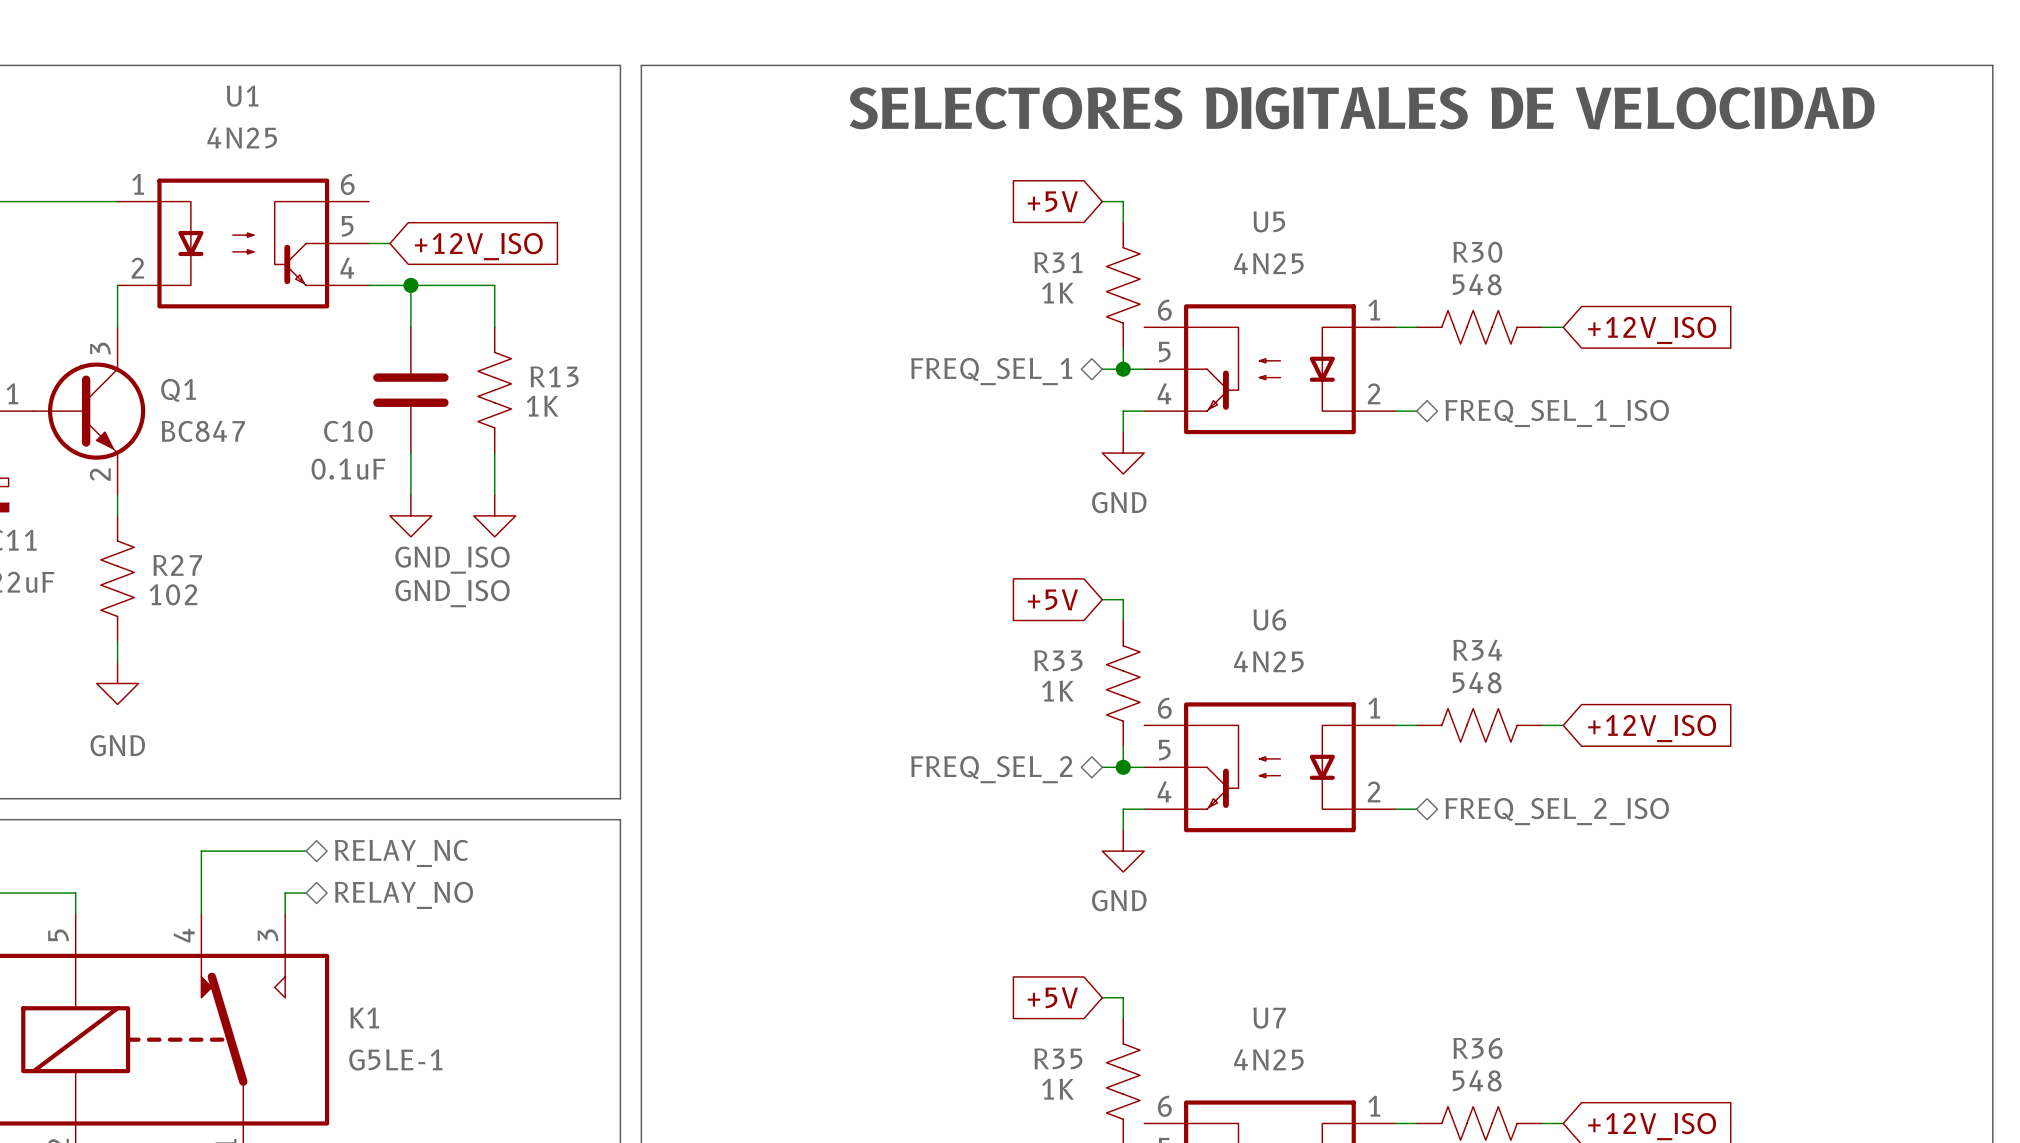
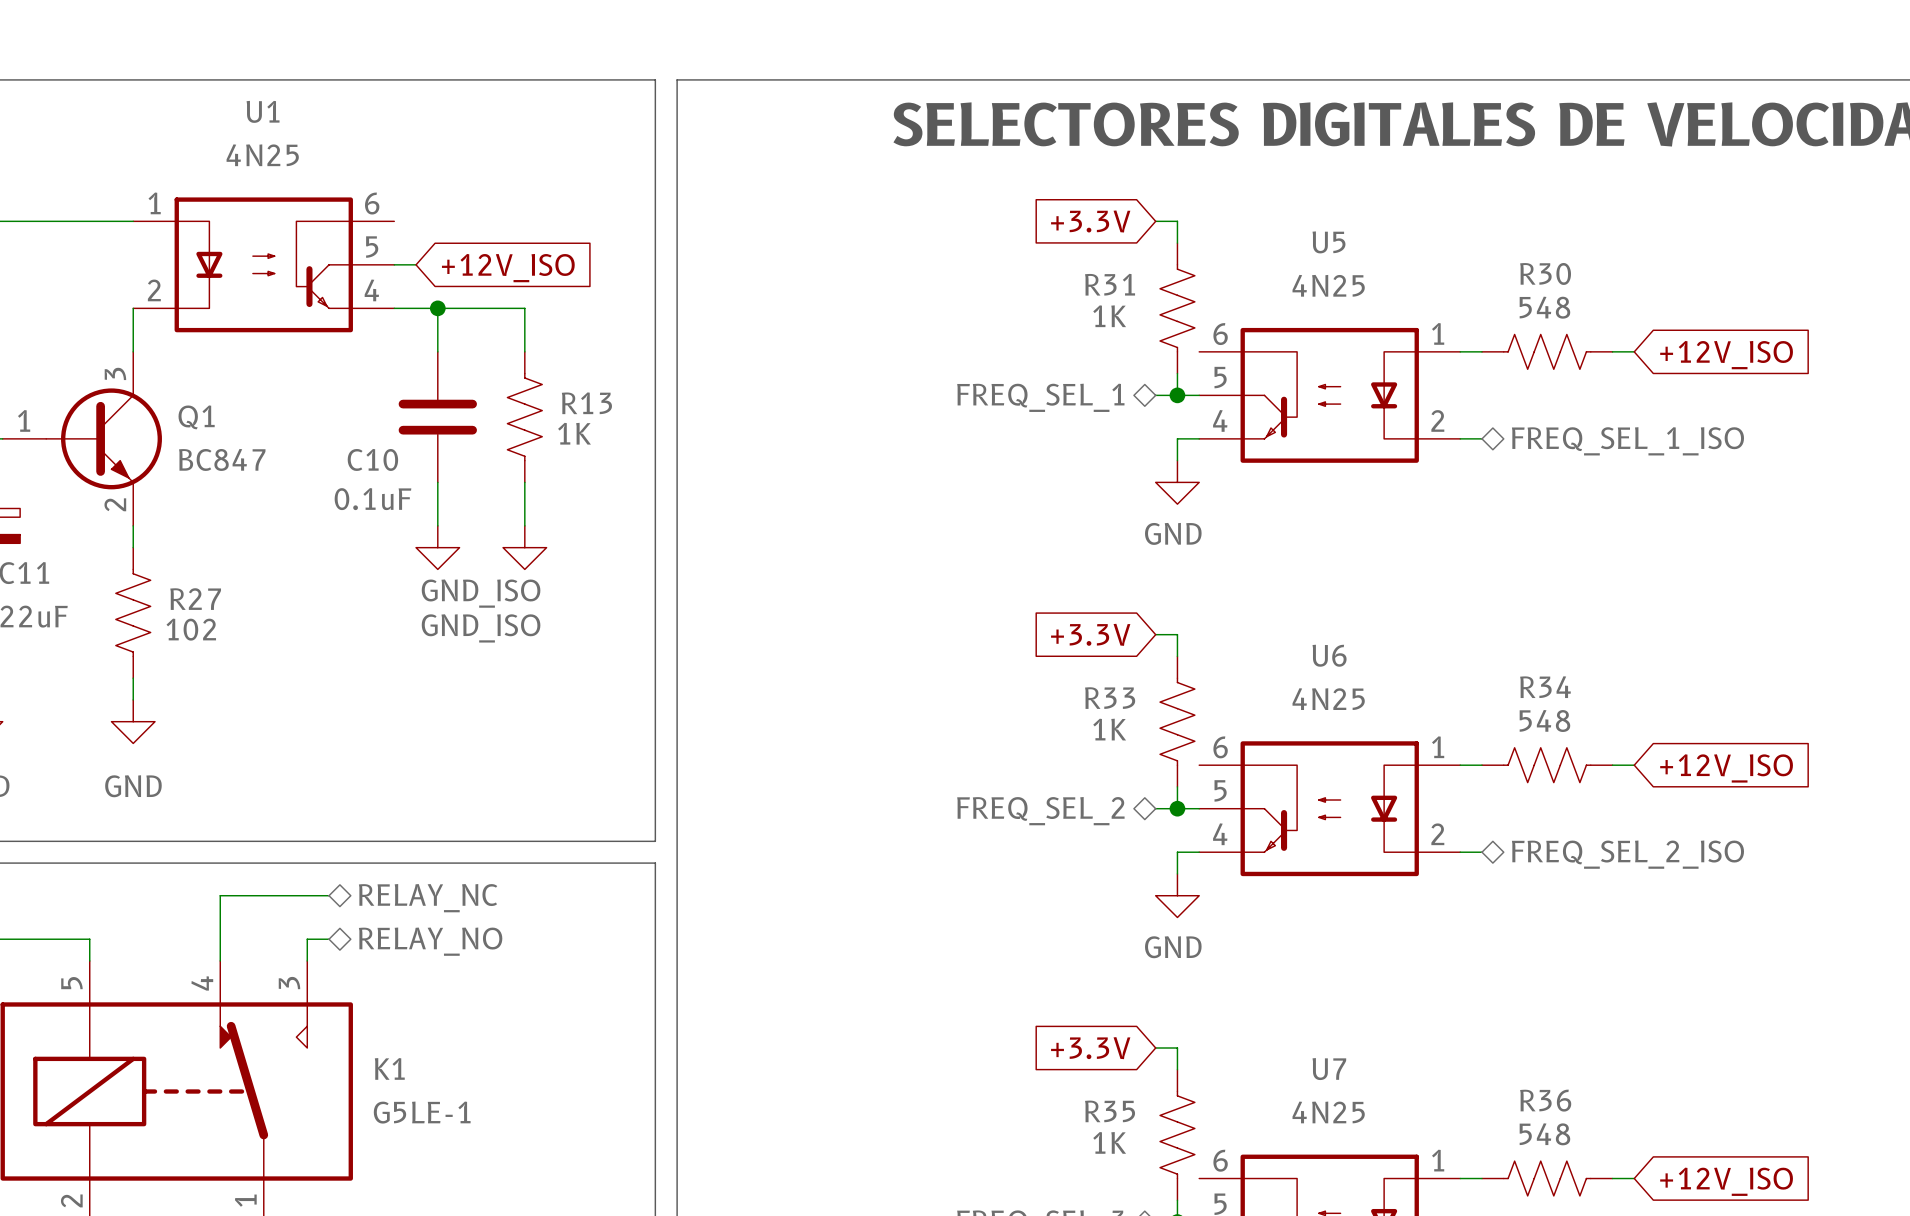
global label: +5V (1052, 201) -> +3.3V (1090, 221)
global label: +5V (1052, 599) -> +3.3V (1090, 634)
global label: +5V (1052, 997) -> +3.3V (1090, 1048)

